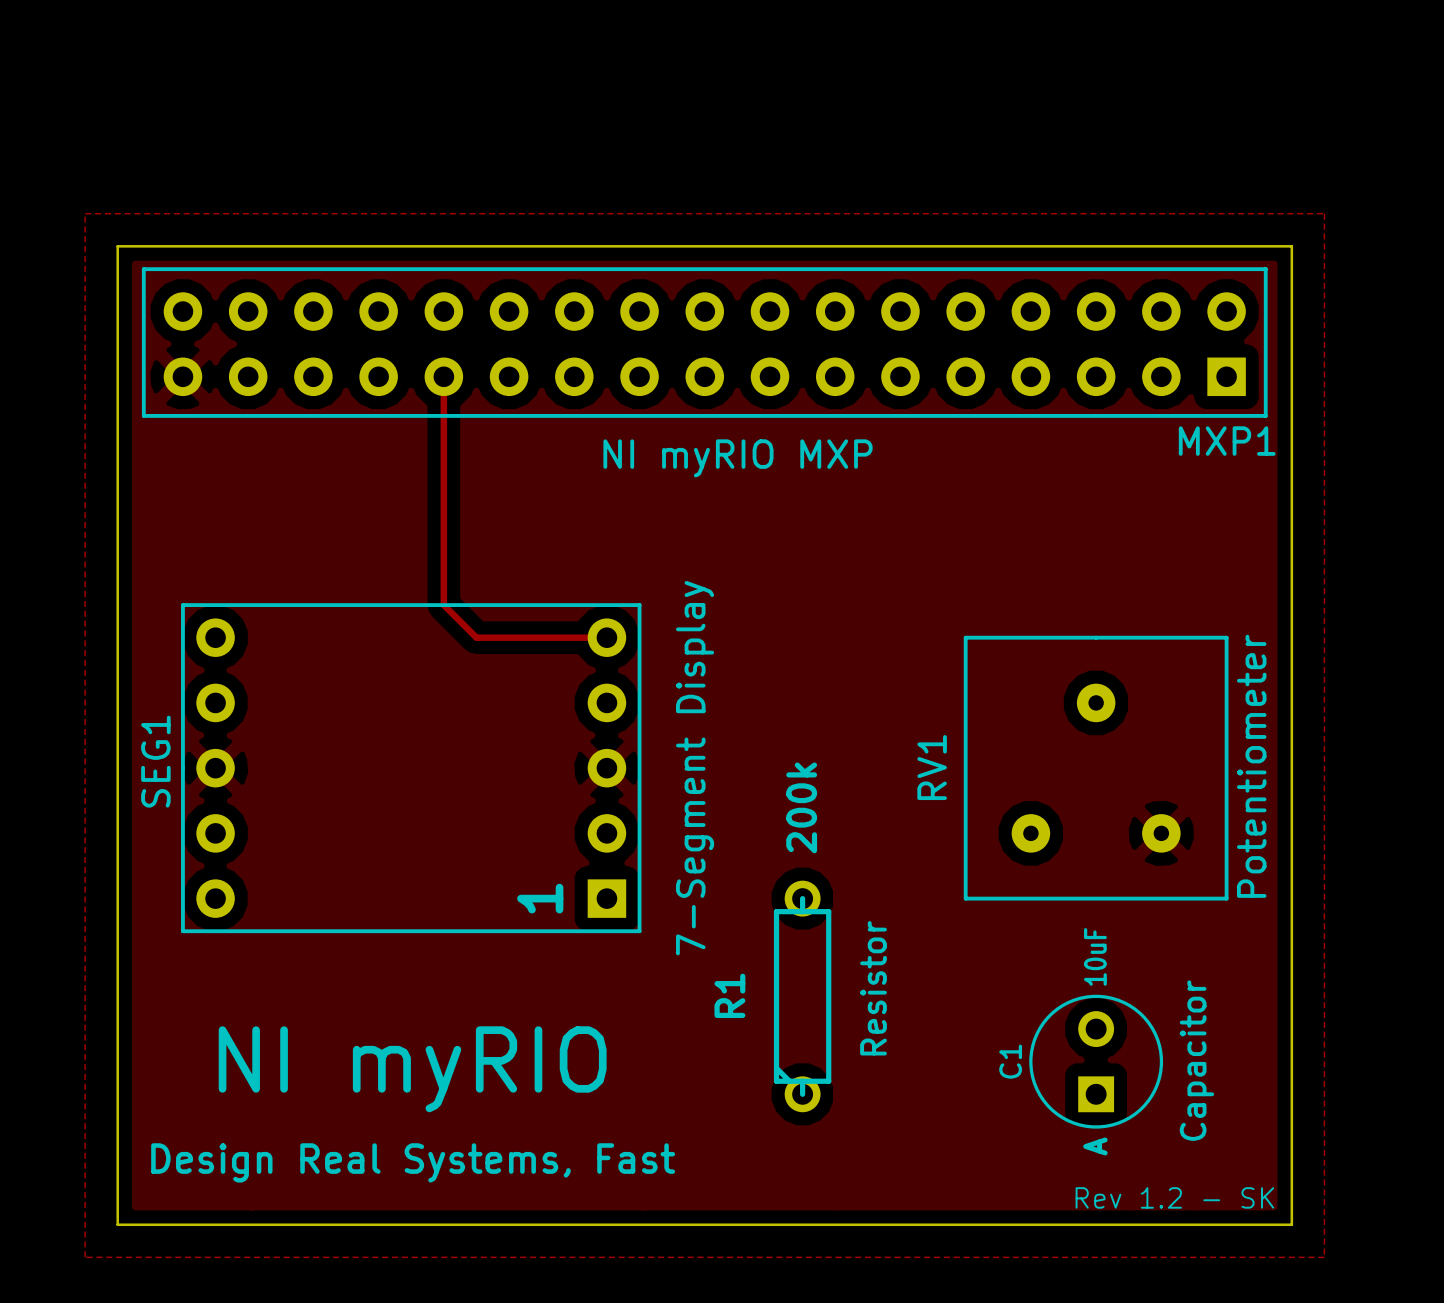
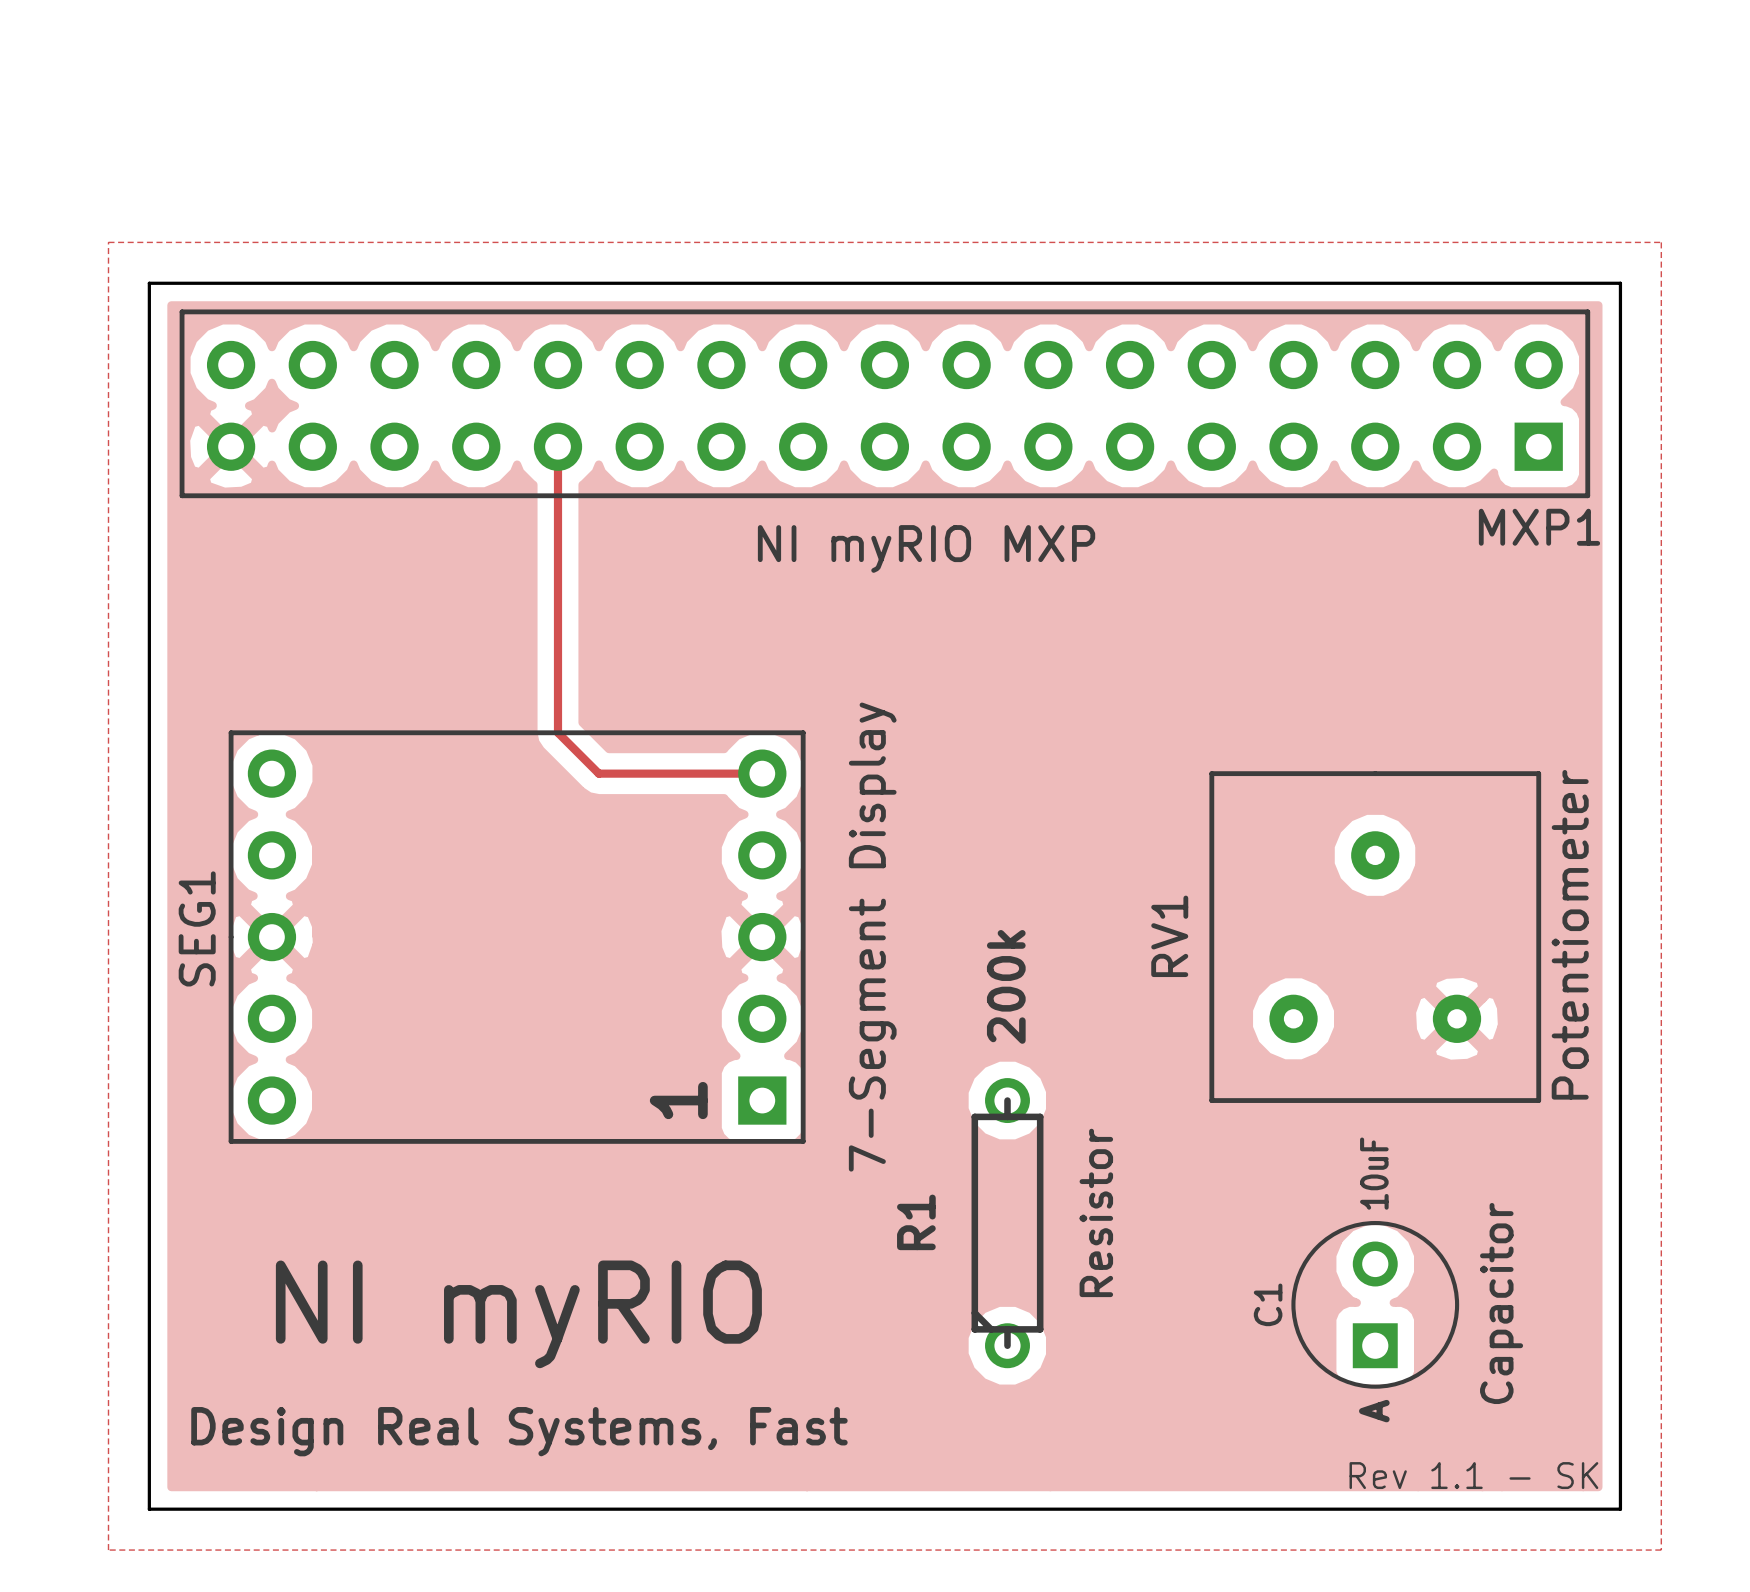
text: Rev 1.2 - SK (1174, 1197) -> Rev 1.1 - SK (1473, 1475)

